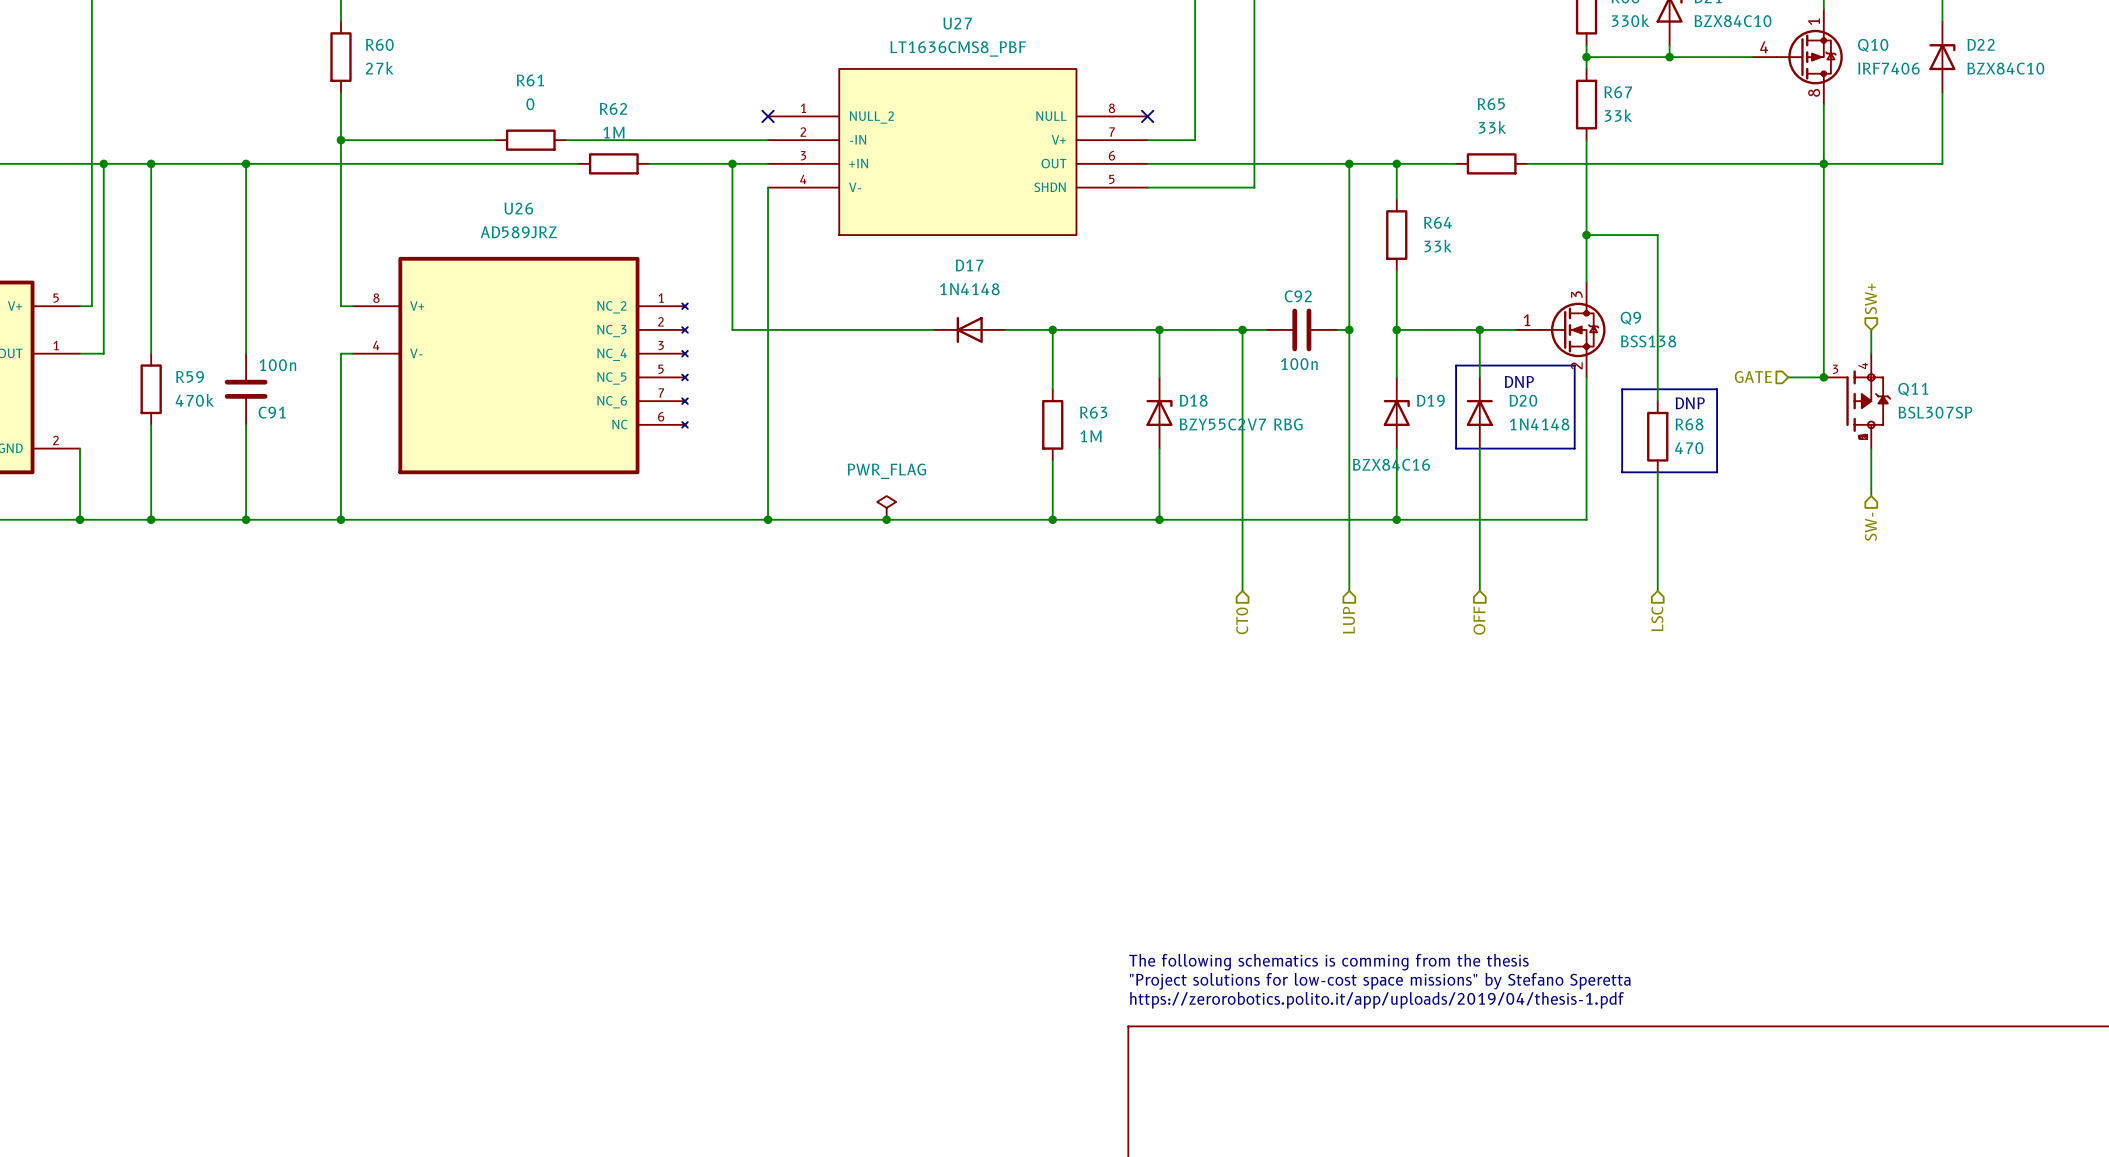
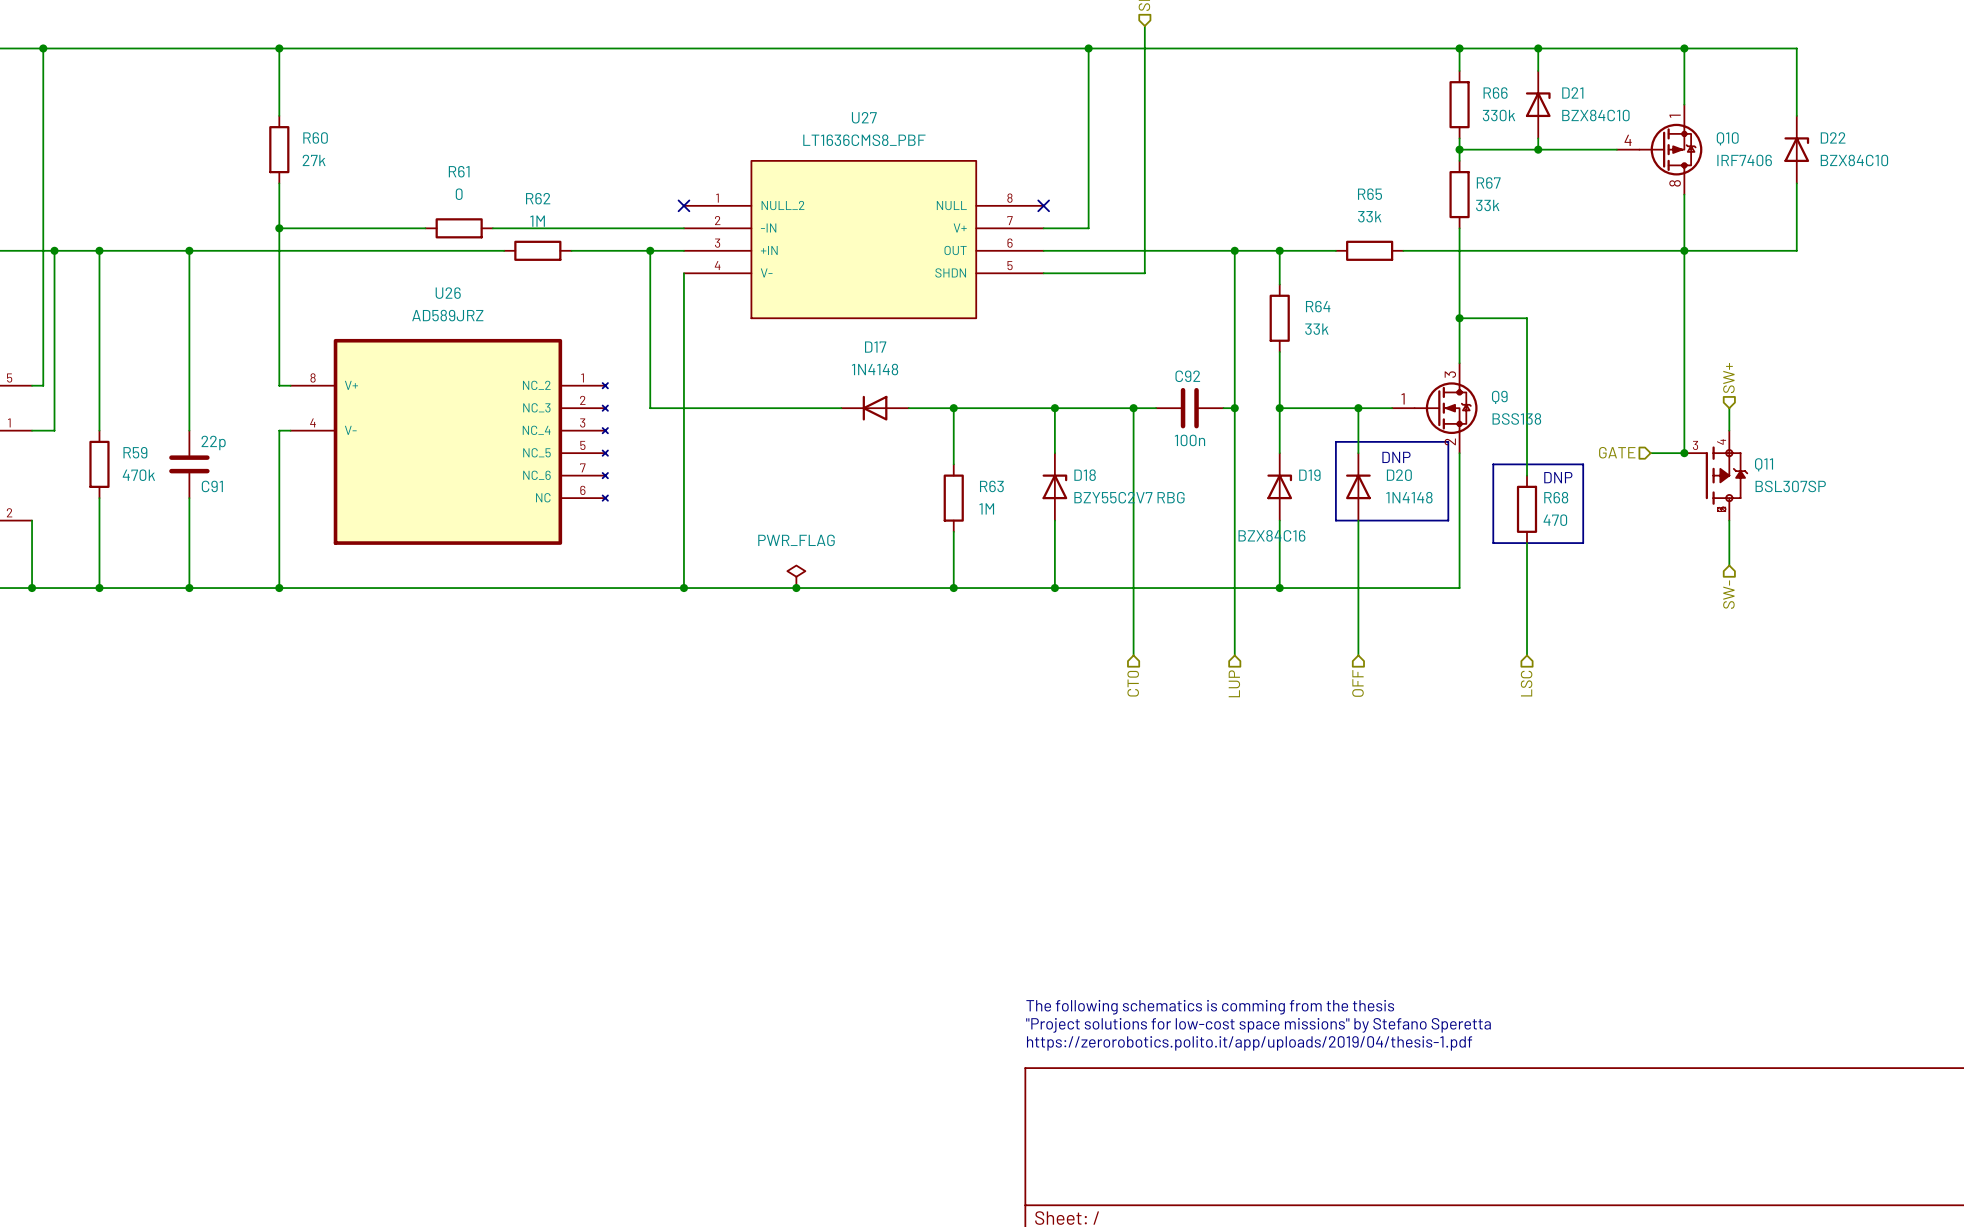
C91 value: 100n (277, 365) -> 22p (213, 442)

